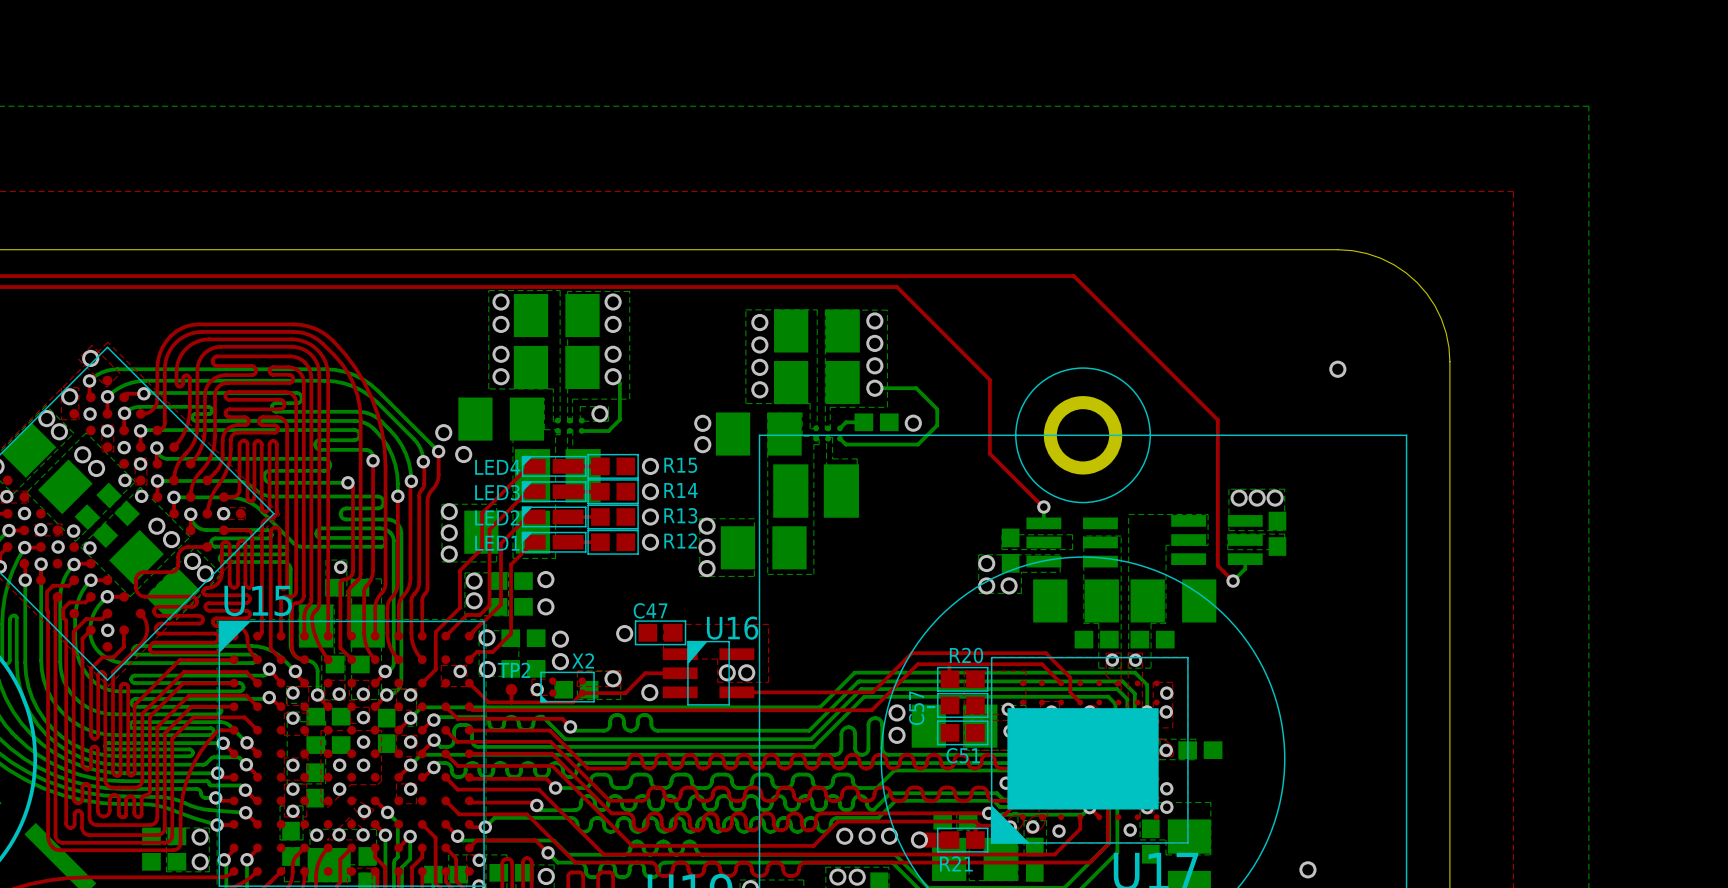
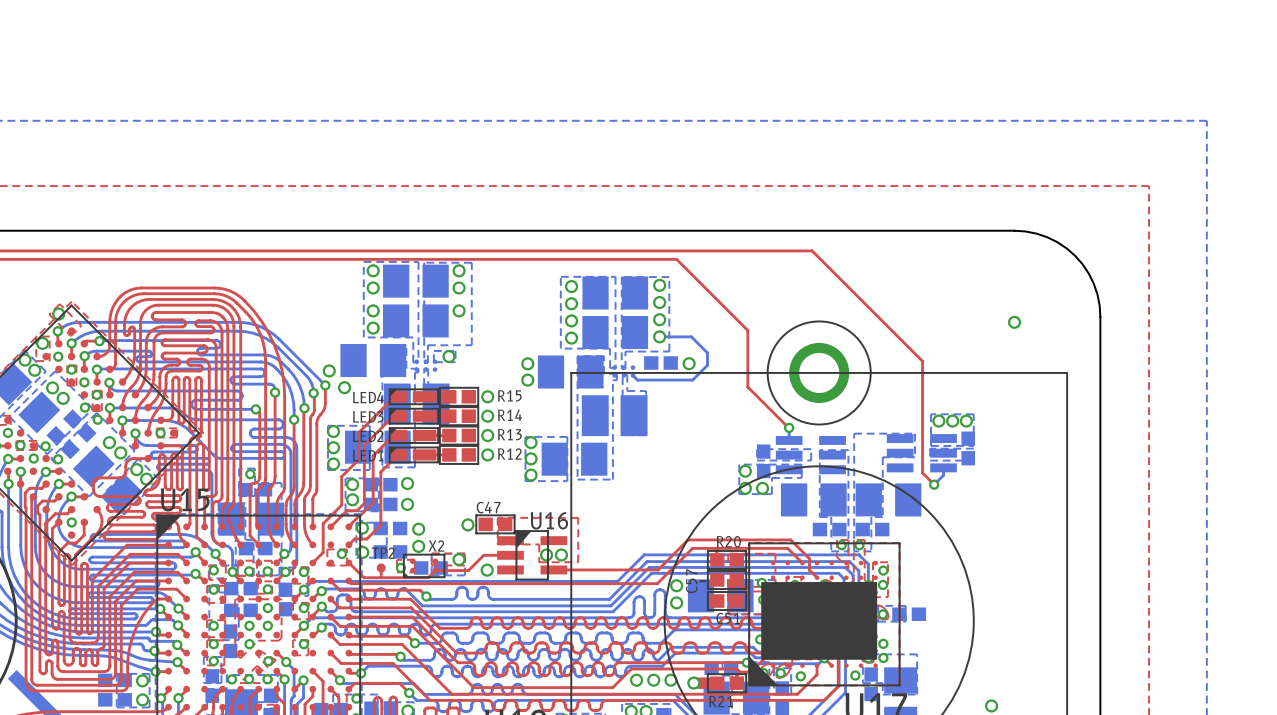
bottom track: (613, 376) (619, 383) (619, 419) (608, 431) (581, 431) -> none
via: (613, 376) -> none
bottom track: (863, 422) (846, 422) (840, 428) -> none

